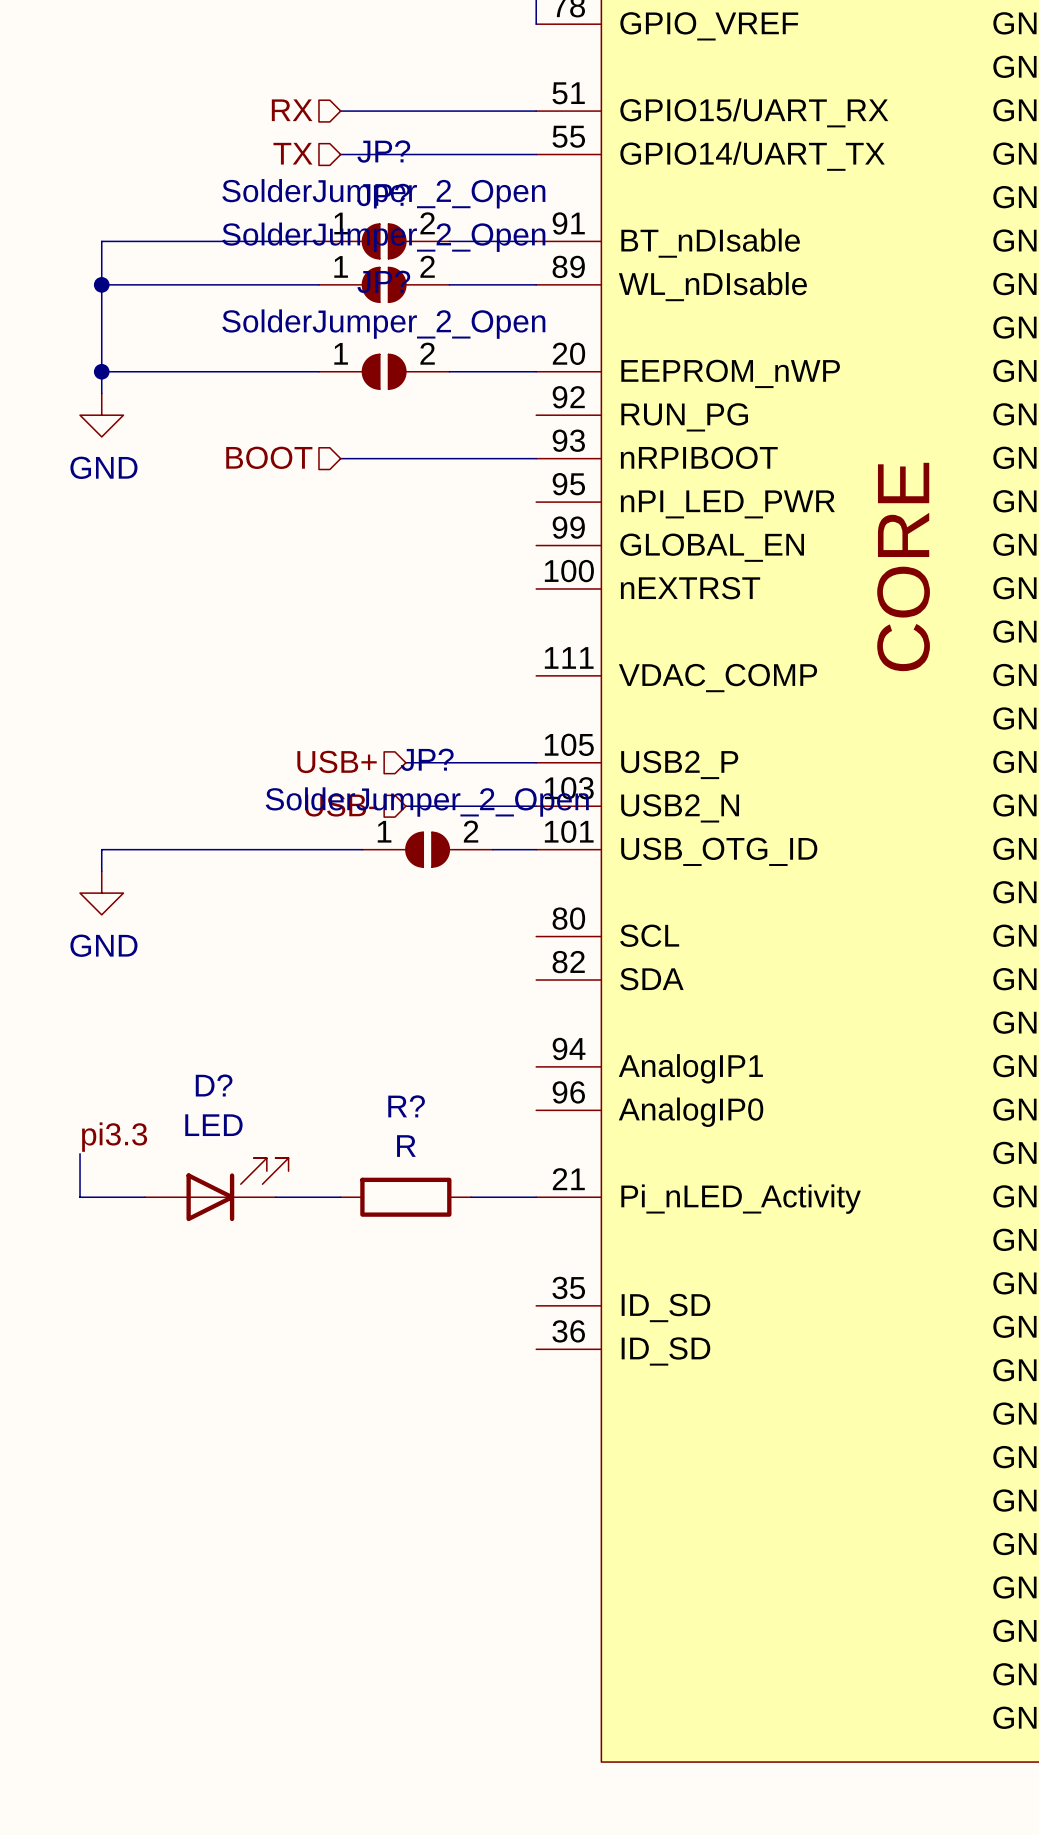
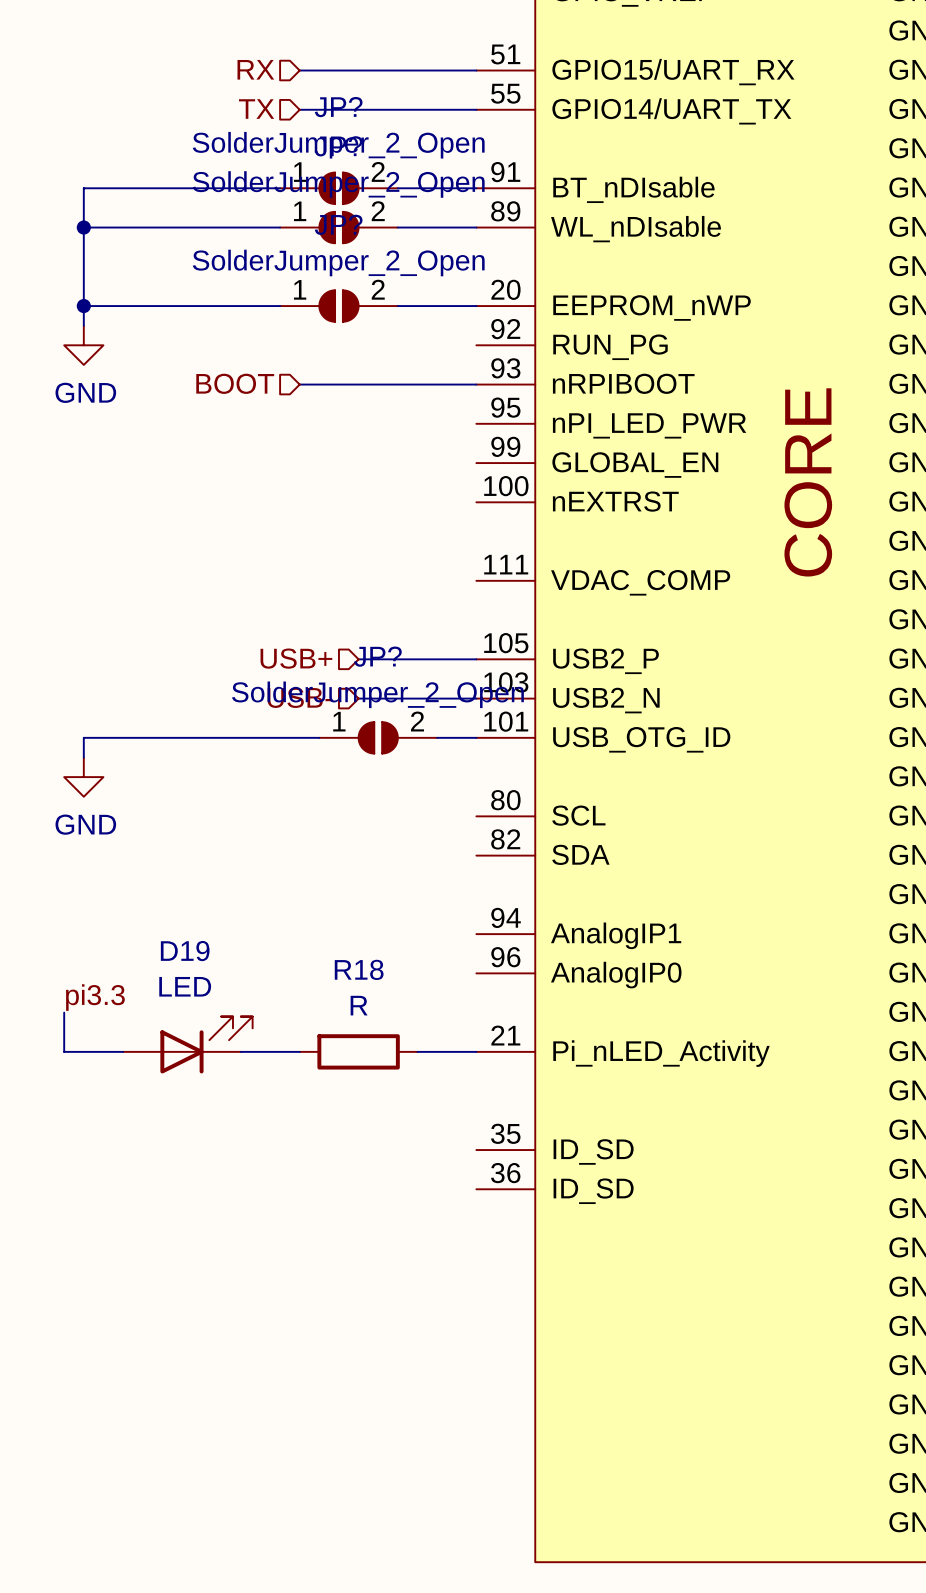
D? name: D? (214, 1085) -> D19 (185, 951)
R? name: R? (406, 1106) -> R18 (359, 969)

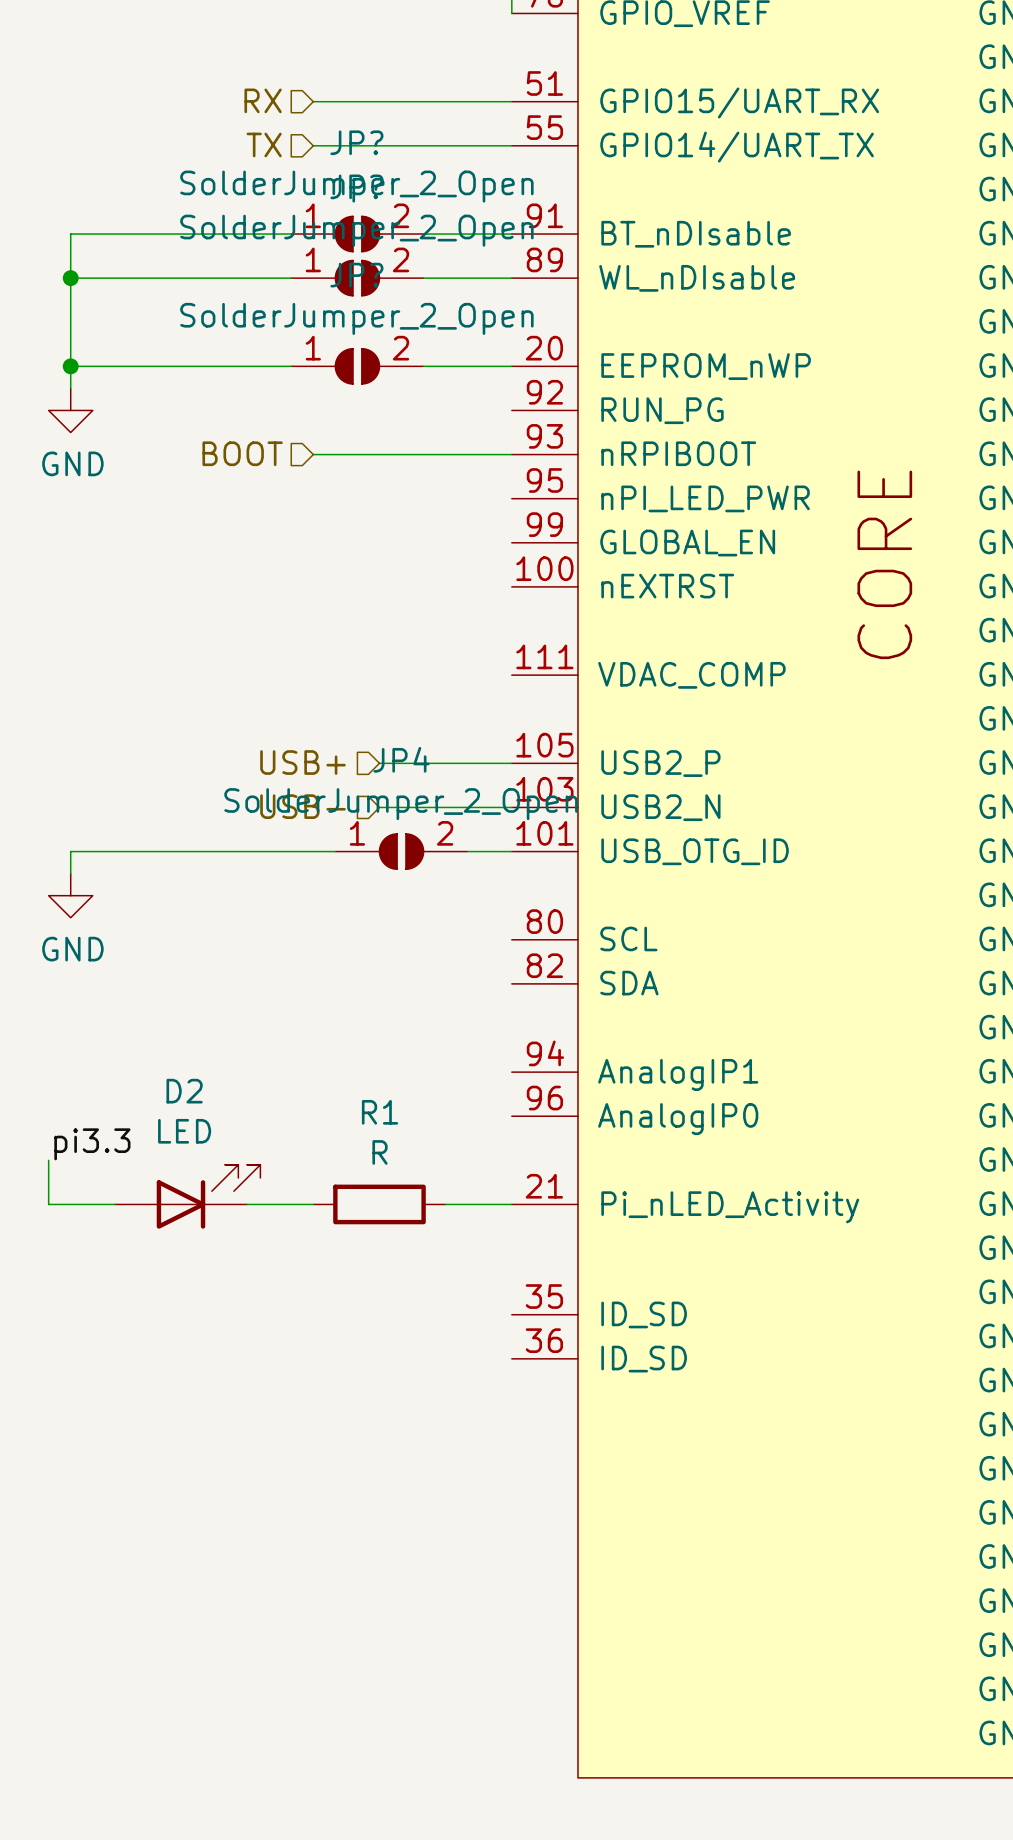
JP? name: JP? (377, 656) -> JP4 (401, 759)
D19 name: D19 (185, 951) -> D2 (184, 1091)
R18 name: R18 (359, 969) -> R1 (380, 1112)

